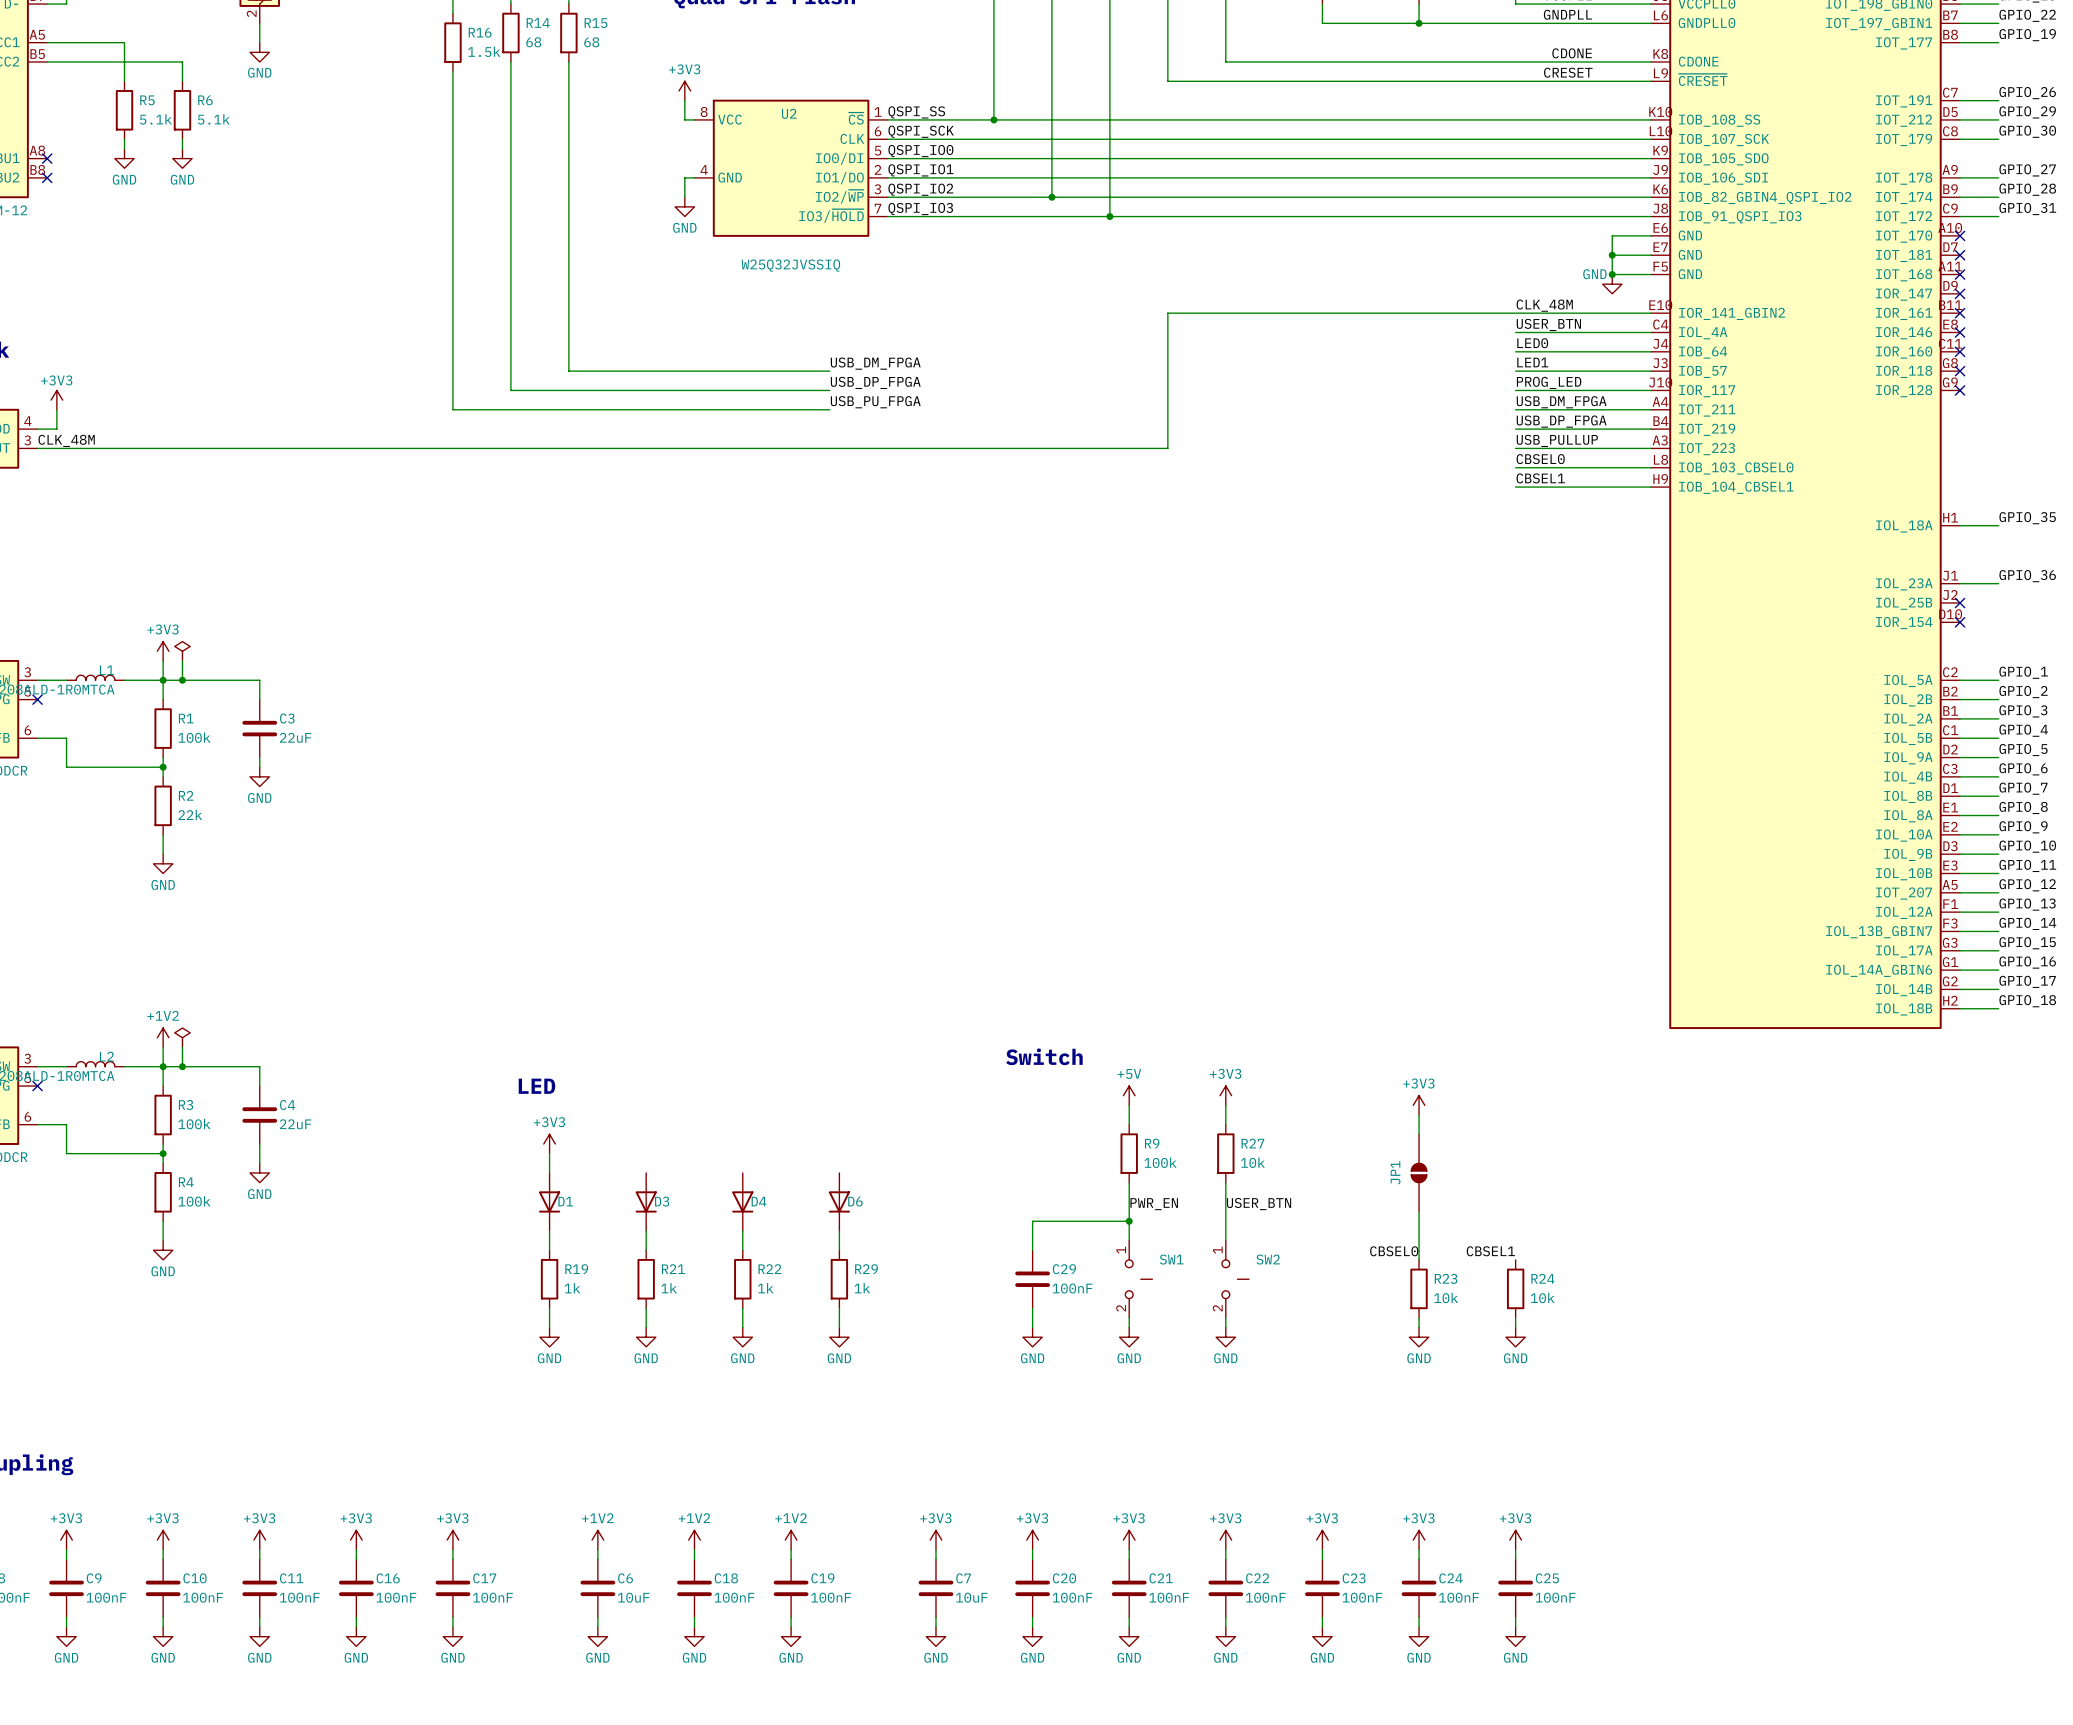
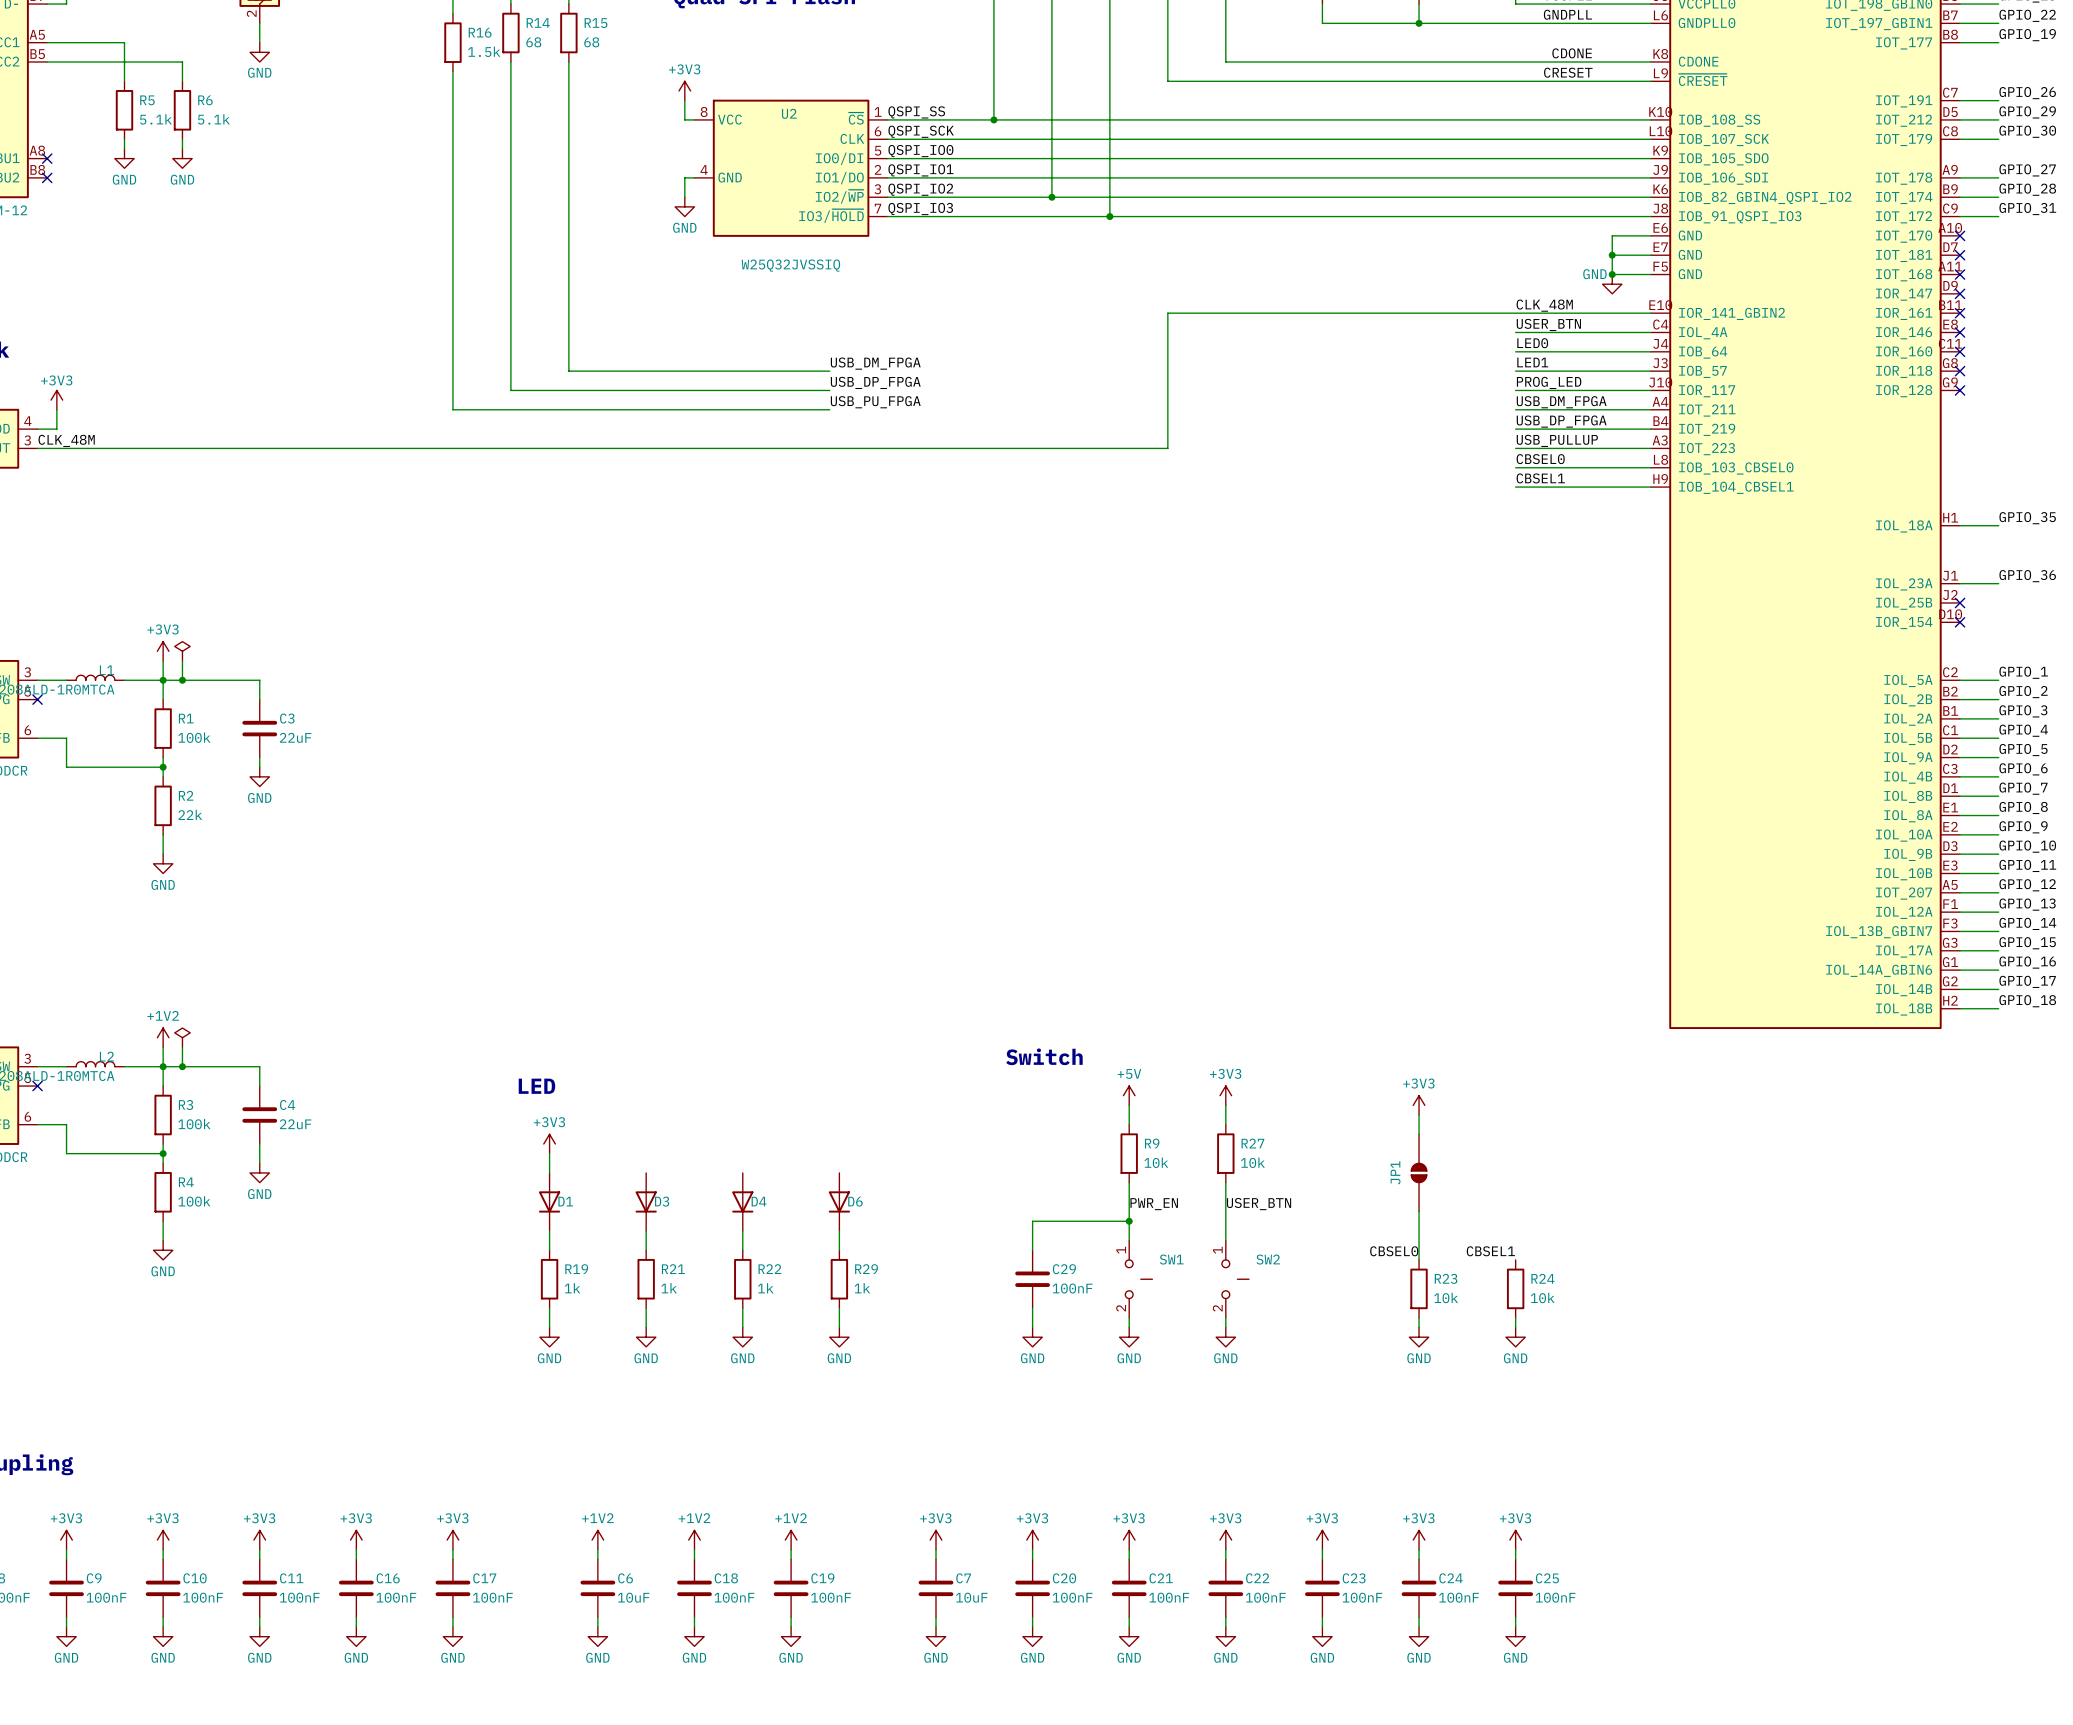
R9 value: 100k (1160, 1162) -> 10k (1156, 1162)

